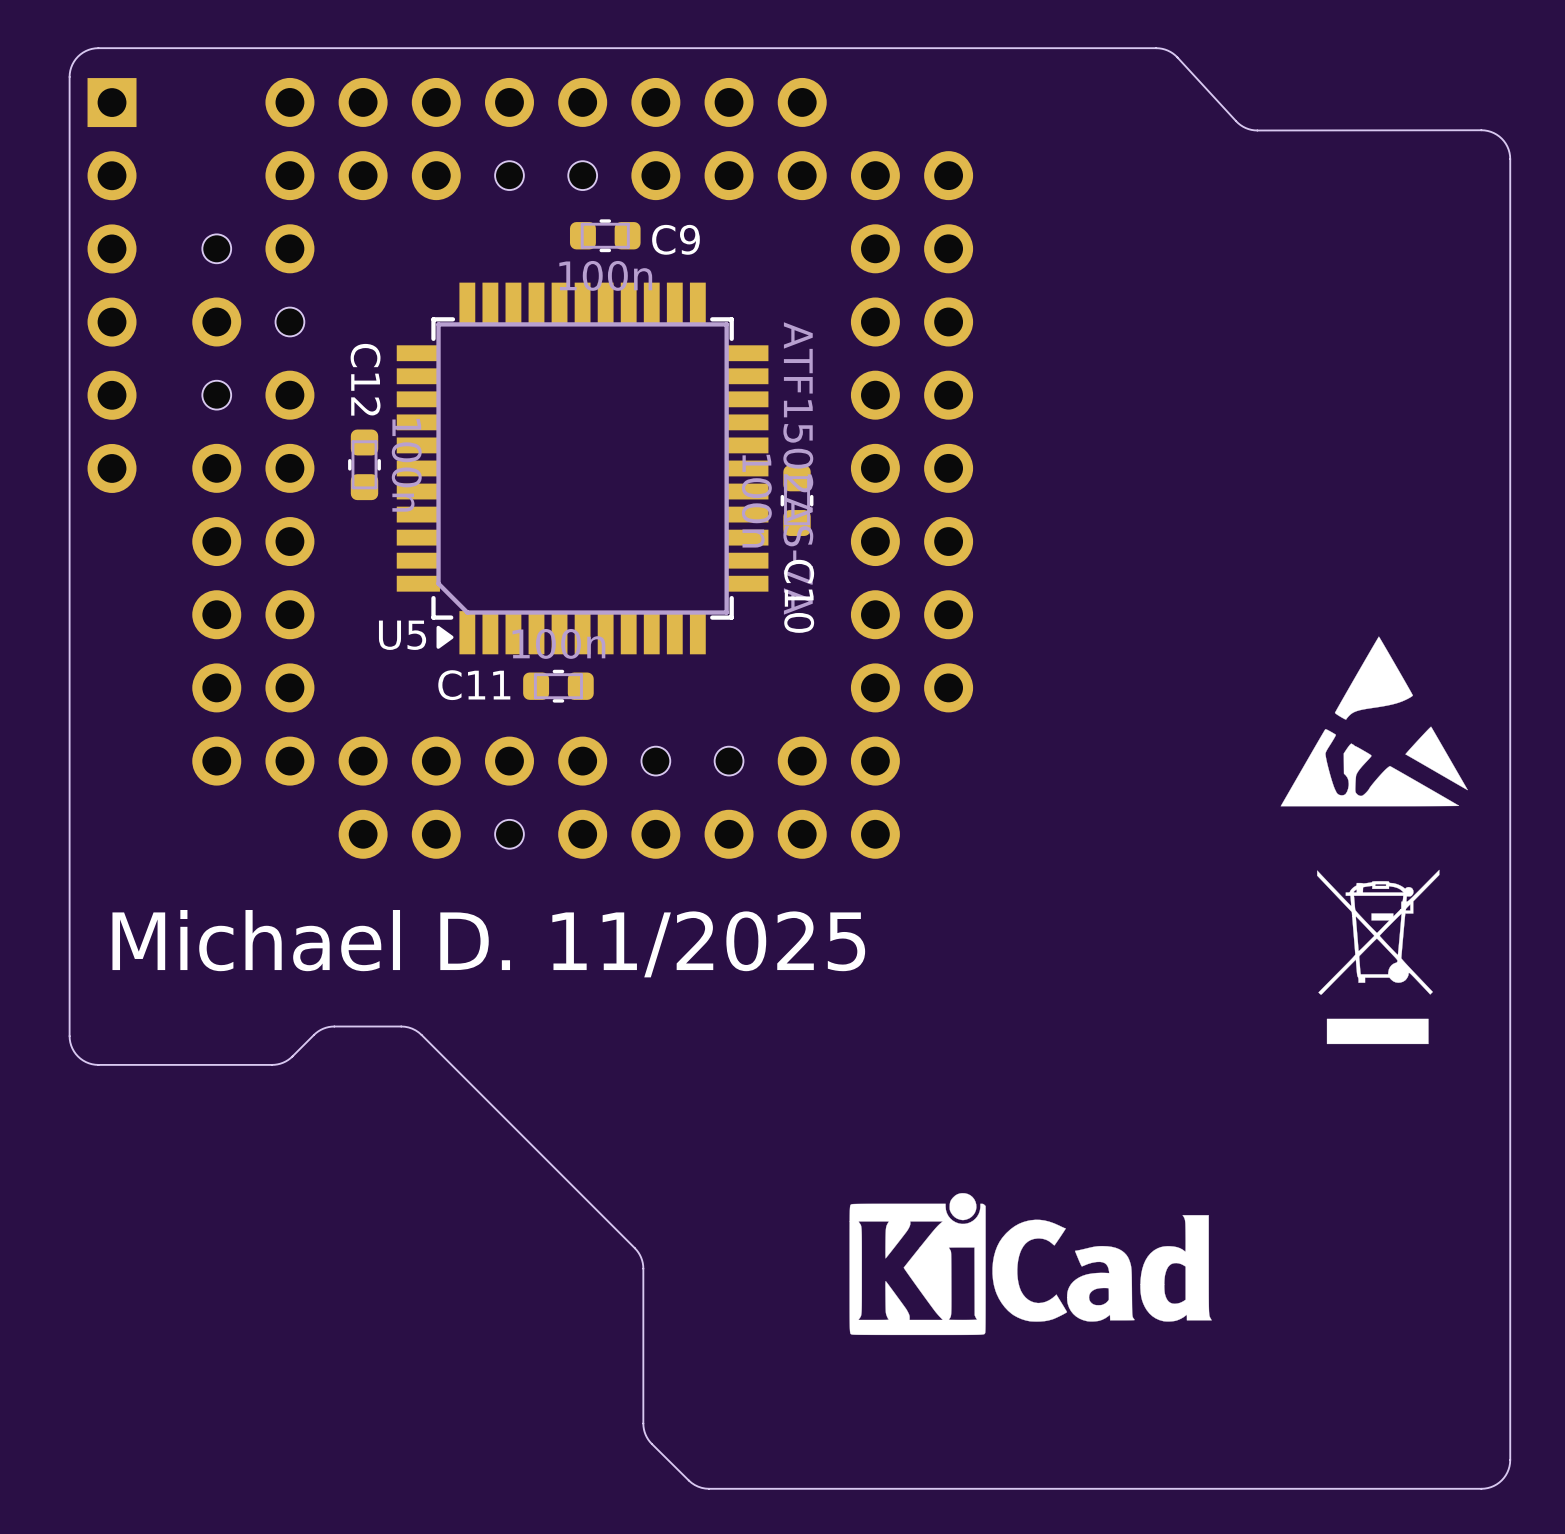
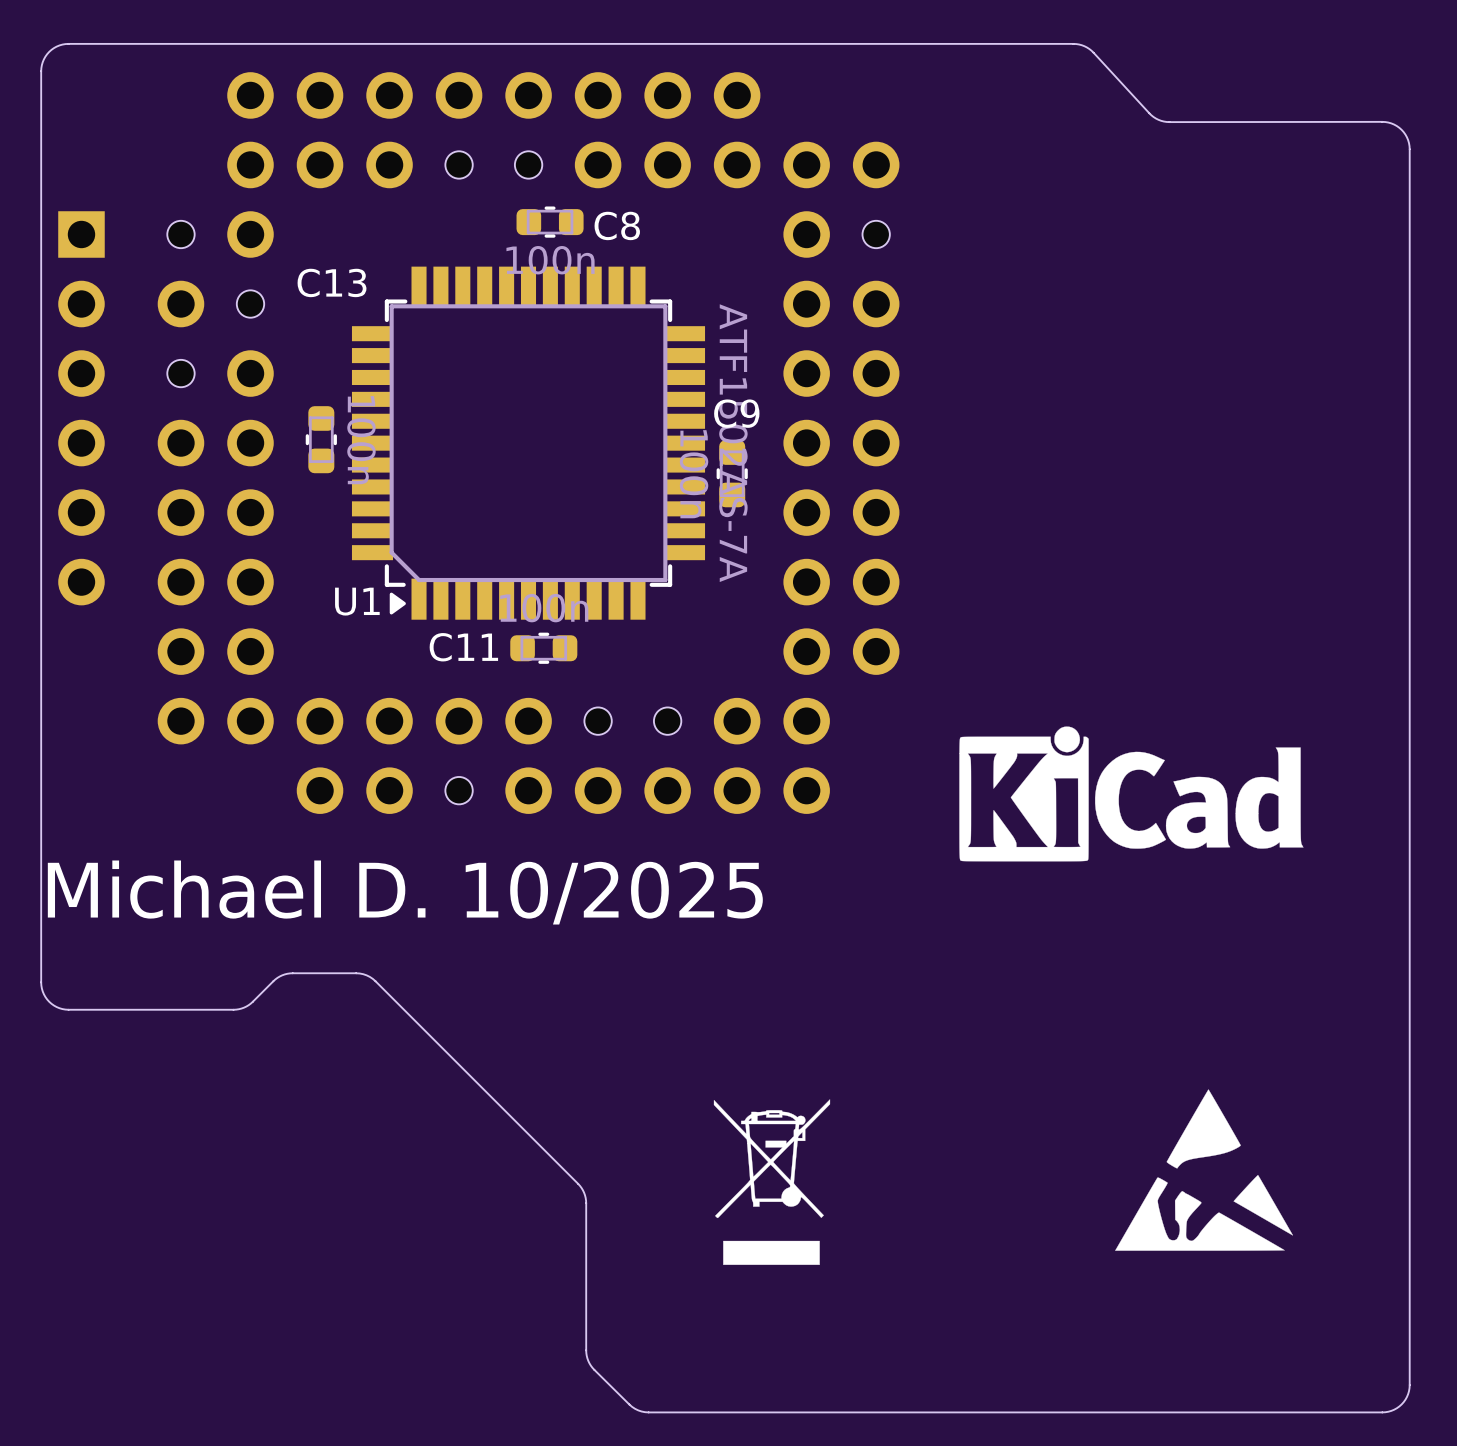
part footprint: [192, 77, 974, 859] -> [157, 72, 900, 814]
C9 name: C9 (675, 239) -> C8 (617, 225)
part position: (112, 285) -> (81, 408)
C12 name: C12 (365, 379) -> C13 (332, 282)
C10 name: C10 (799, 596) -> C9 (736, 413)
U5 name: U5 (402, 635) -> U1 (357, 601)
C11 position: (558, 686) -> (543, 648)
drawing position: (1374, 721) -> (1204, 1170)
text: Michael D. 11/2025 (488, 943) -> Michael D. 10/2025 (405, 892)
drawing position: (1378, 956) -> (771, 1182)
drawing position: (1030, 1264) -> (1131, 793)

